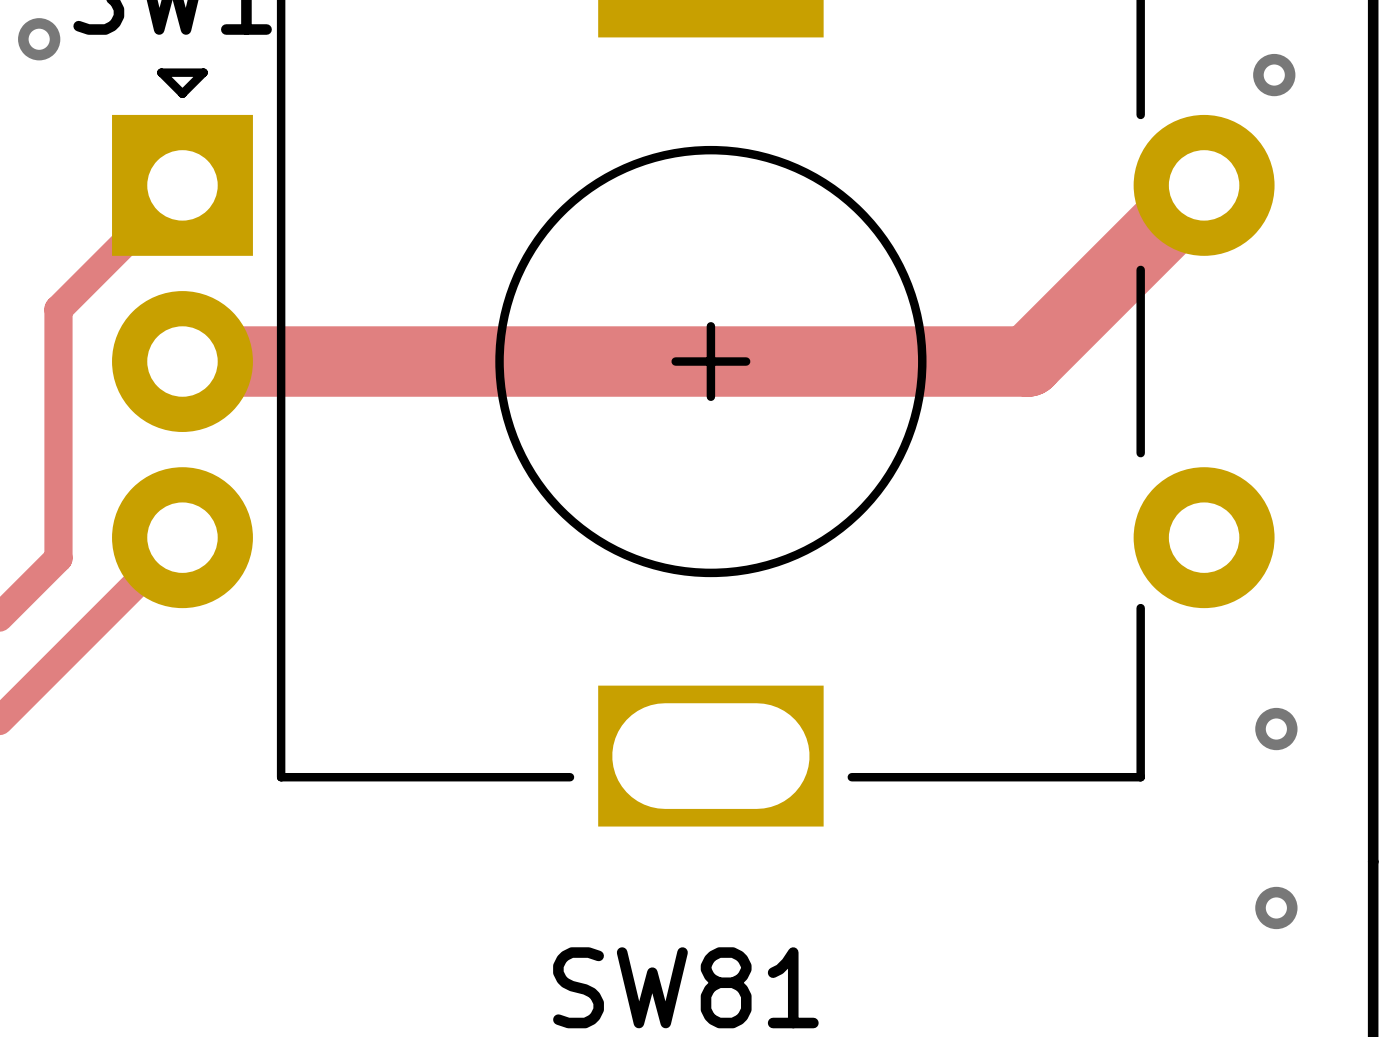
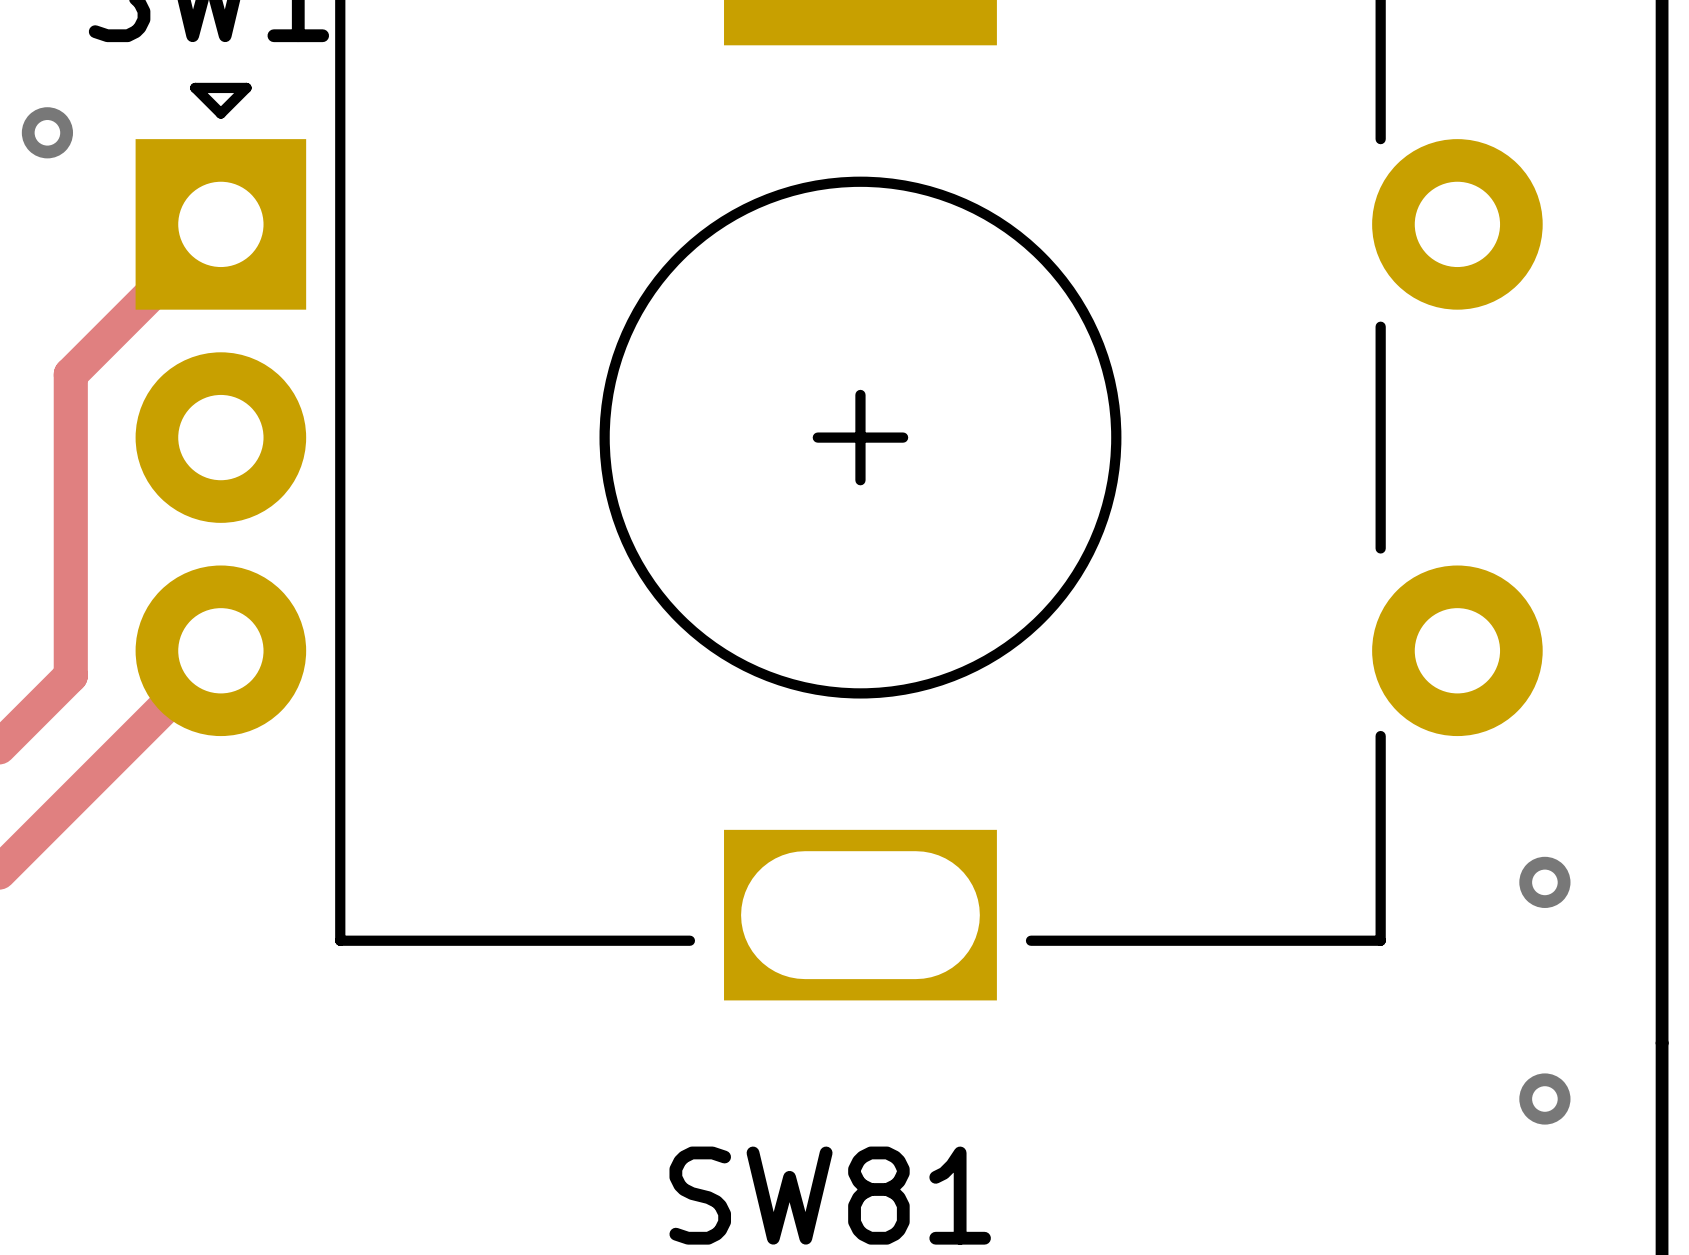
via position: (39, 39) -> (47, 132)
via: (1274, 75) -> none
track: (1204, 185) (1027, 361) (182, 361) -> none

